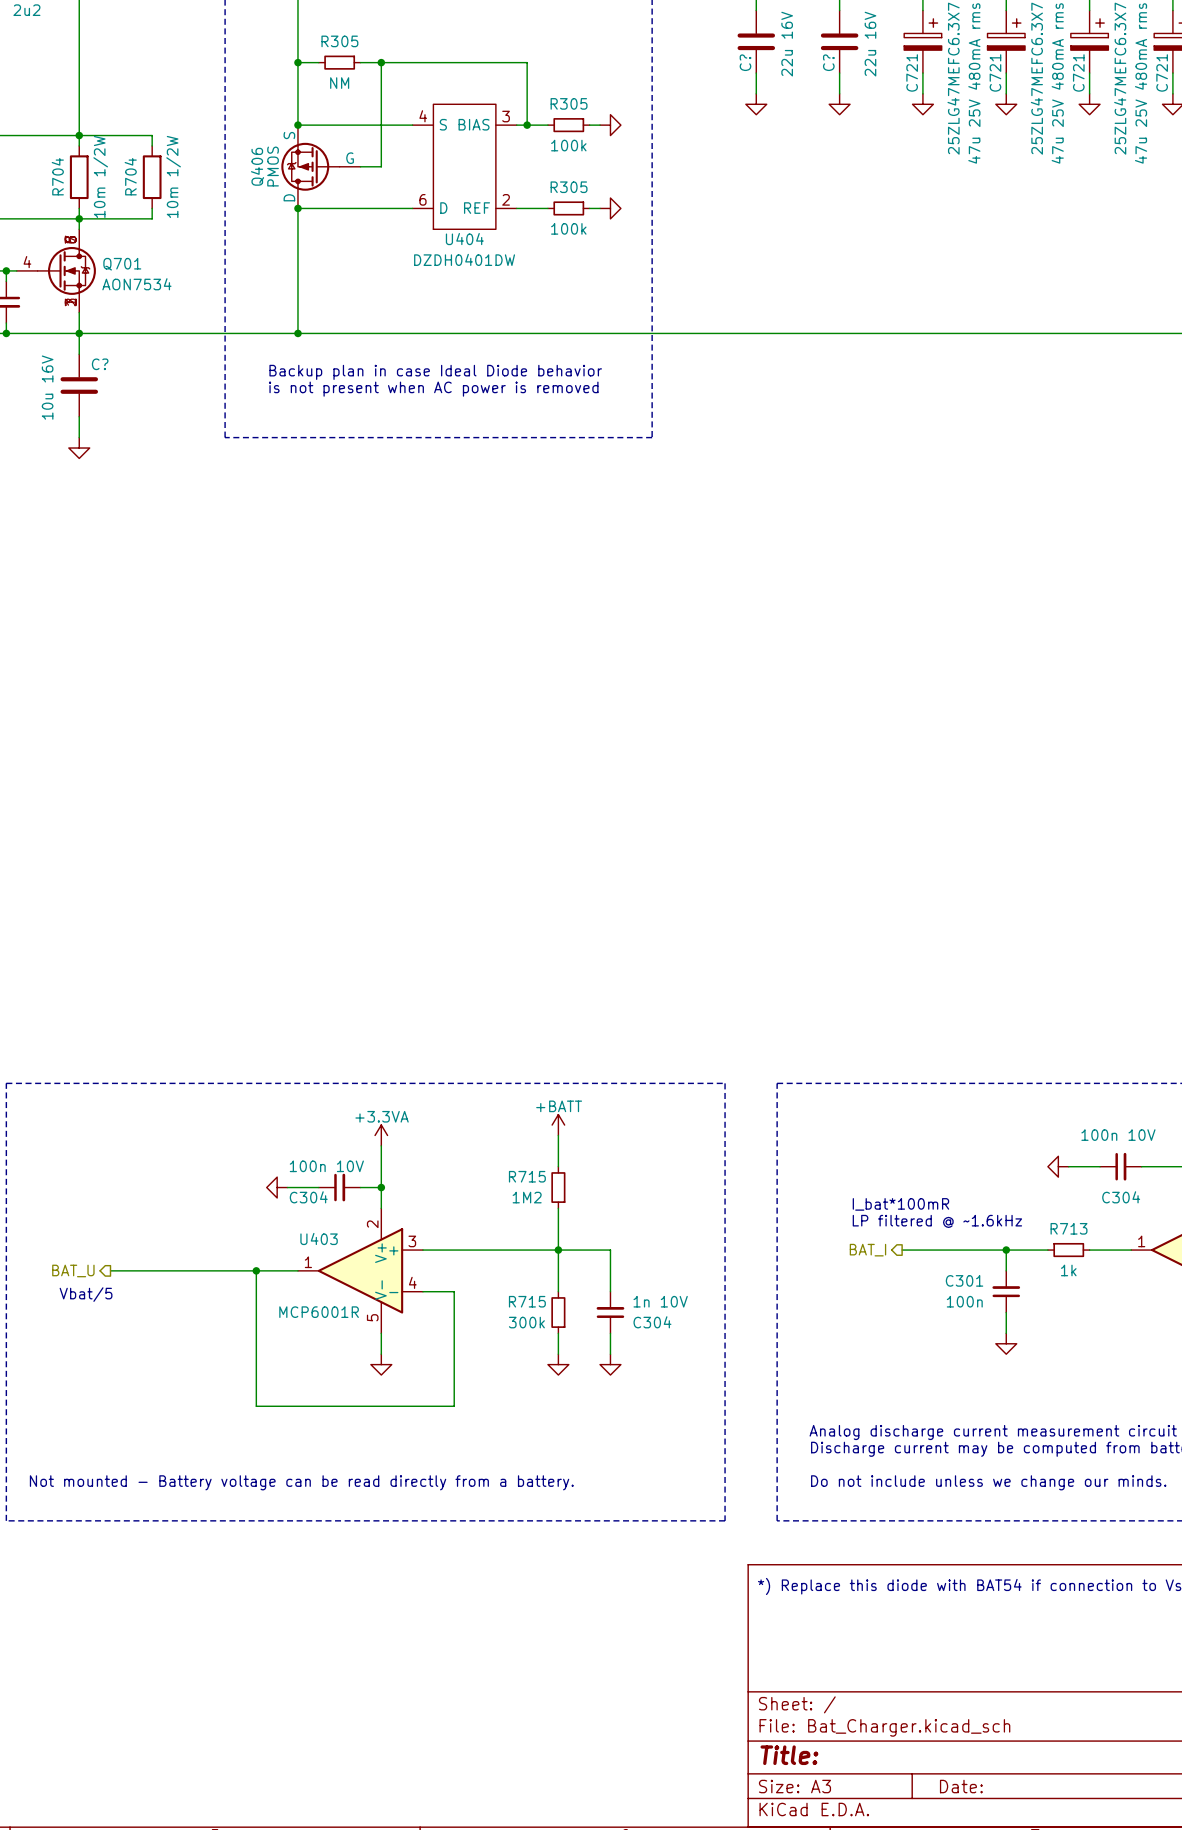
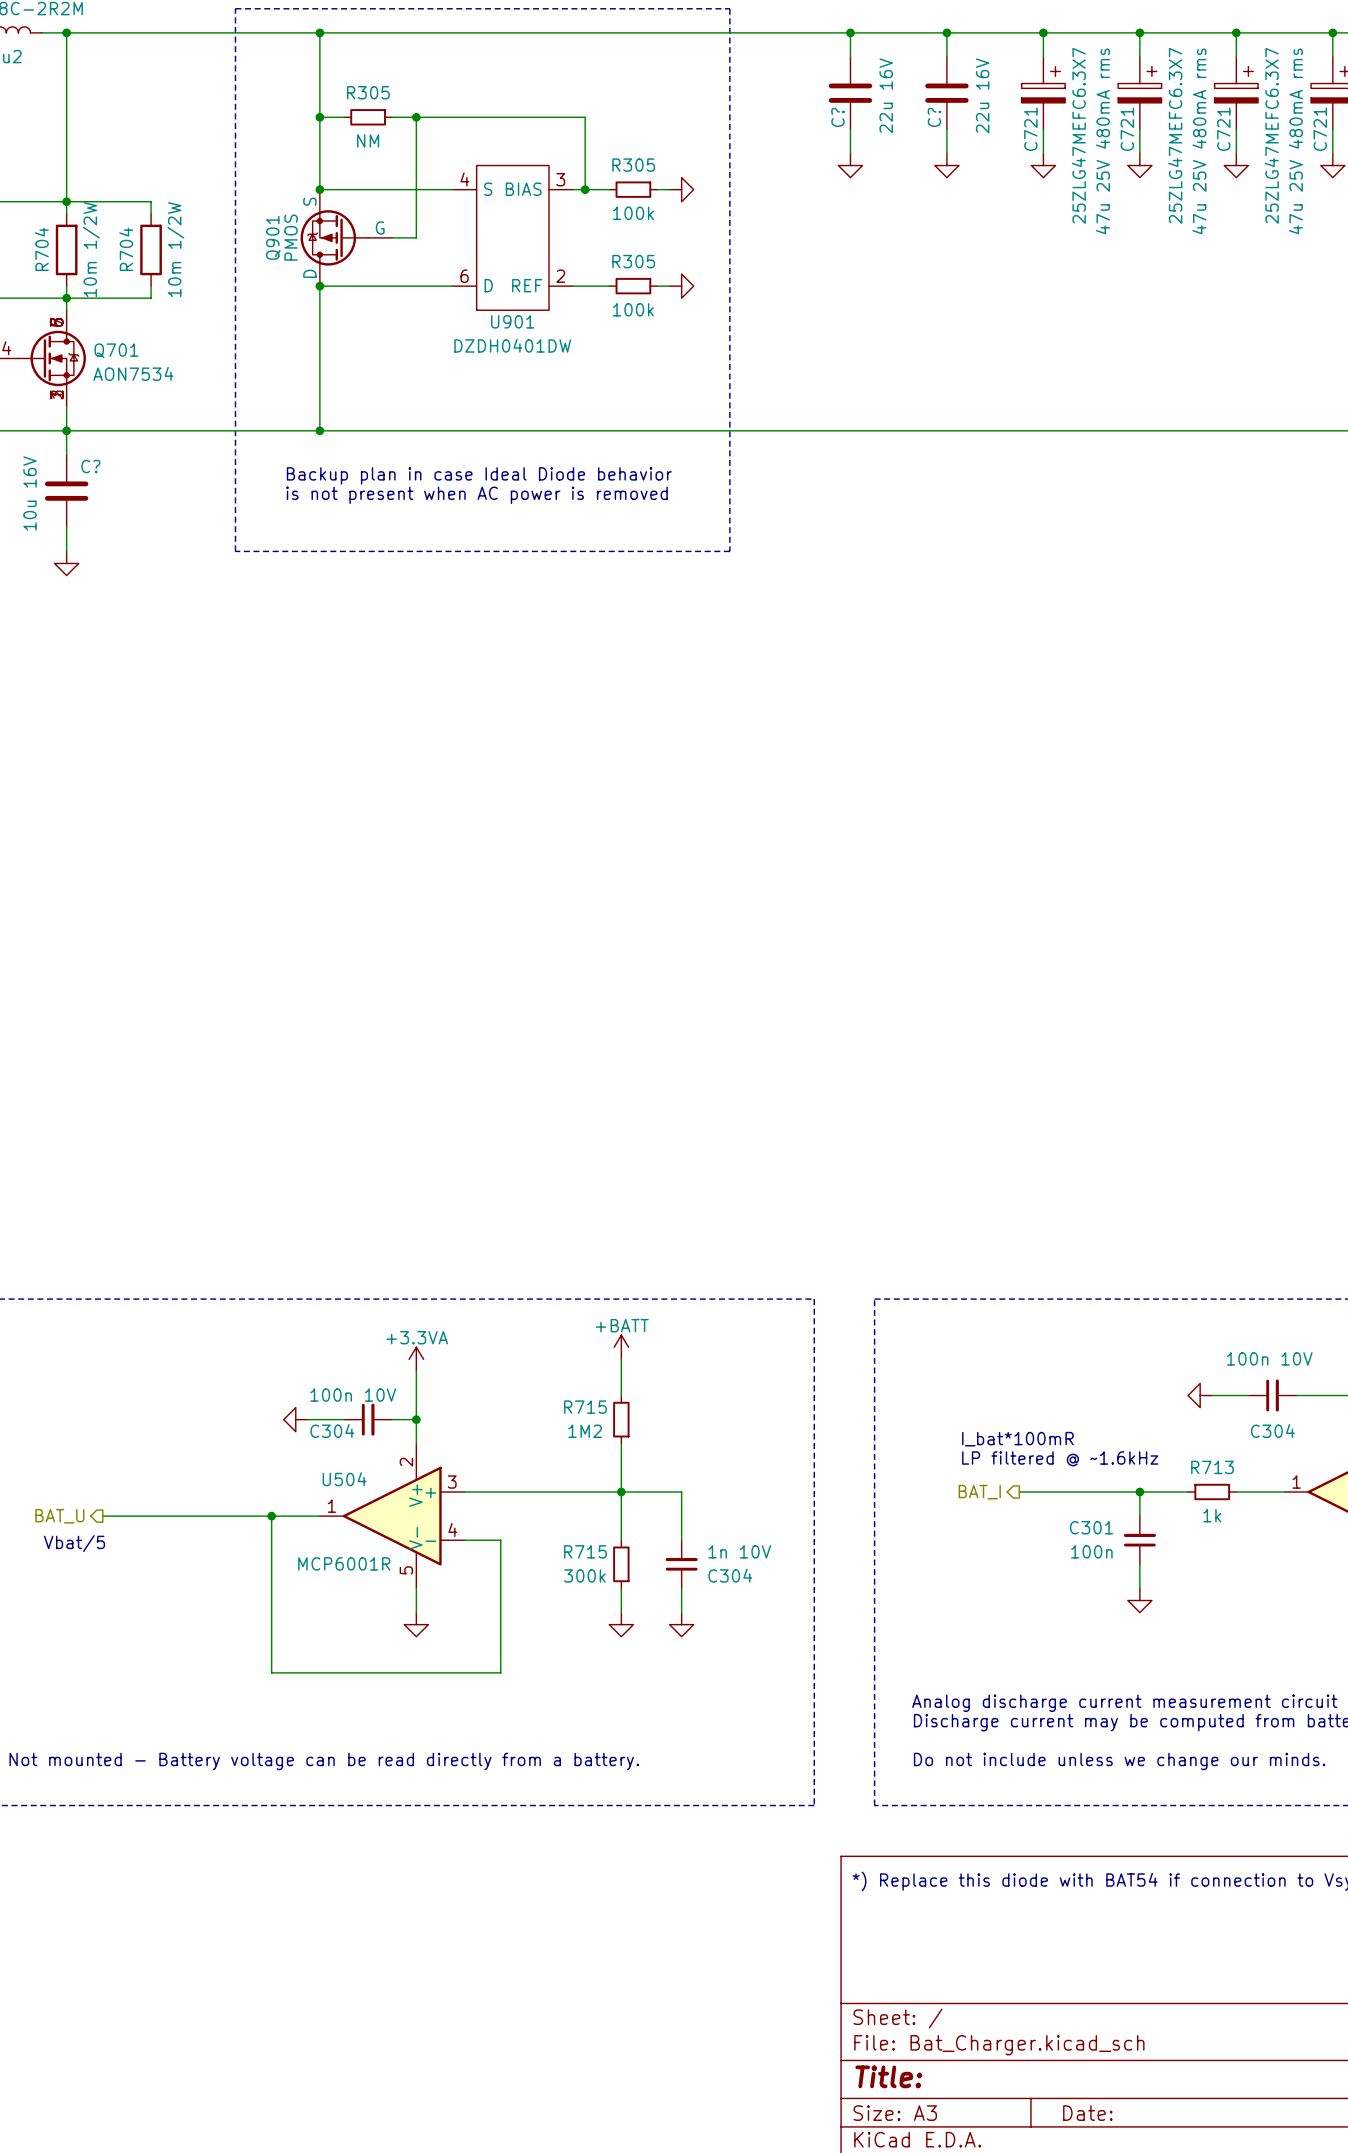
Q406 name: Q406 (257, 166) -> Q901 (273, 237)
U404 name: U404 (464, 239) -> U901 (512, 321)
U403 name: U403 (319, 1238) -> U504 (344, 1479)

